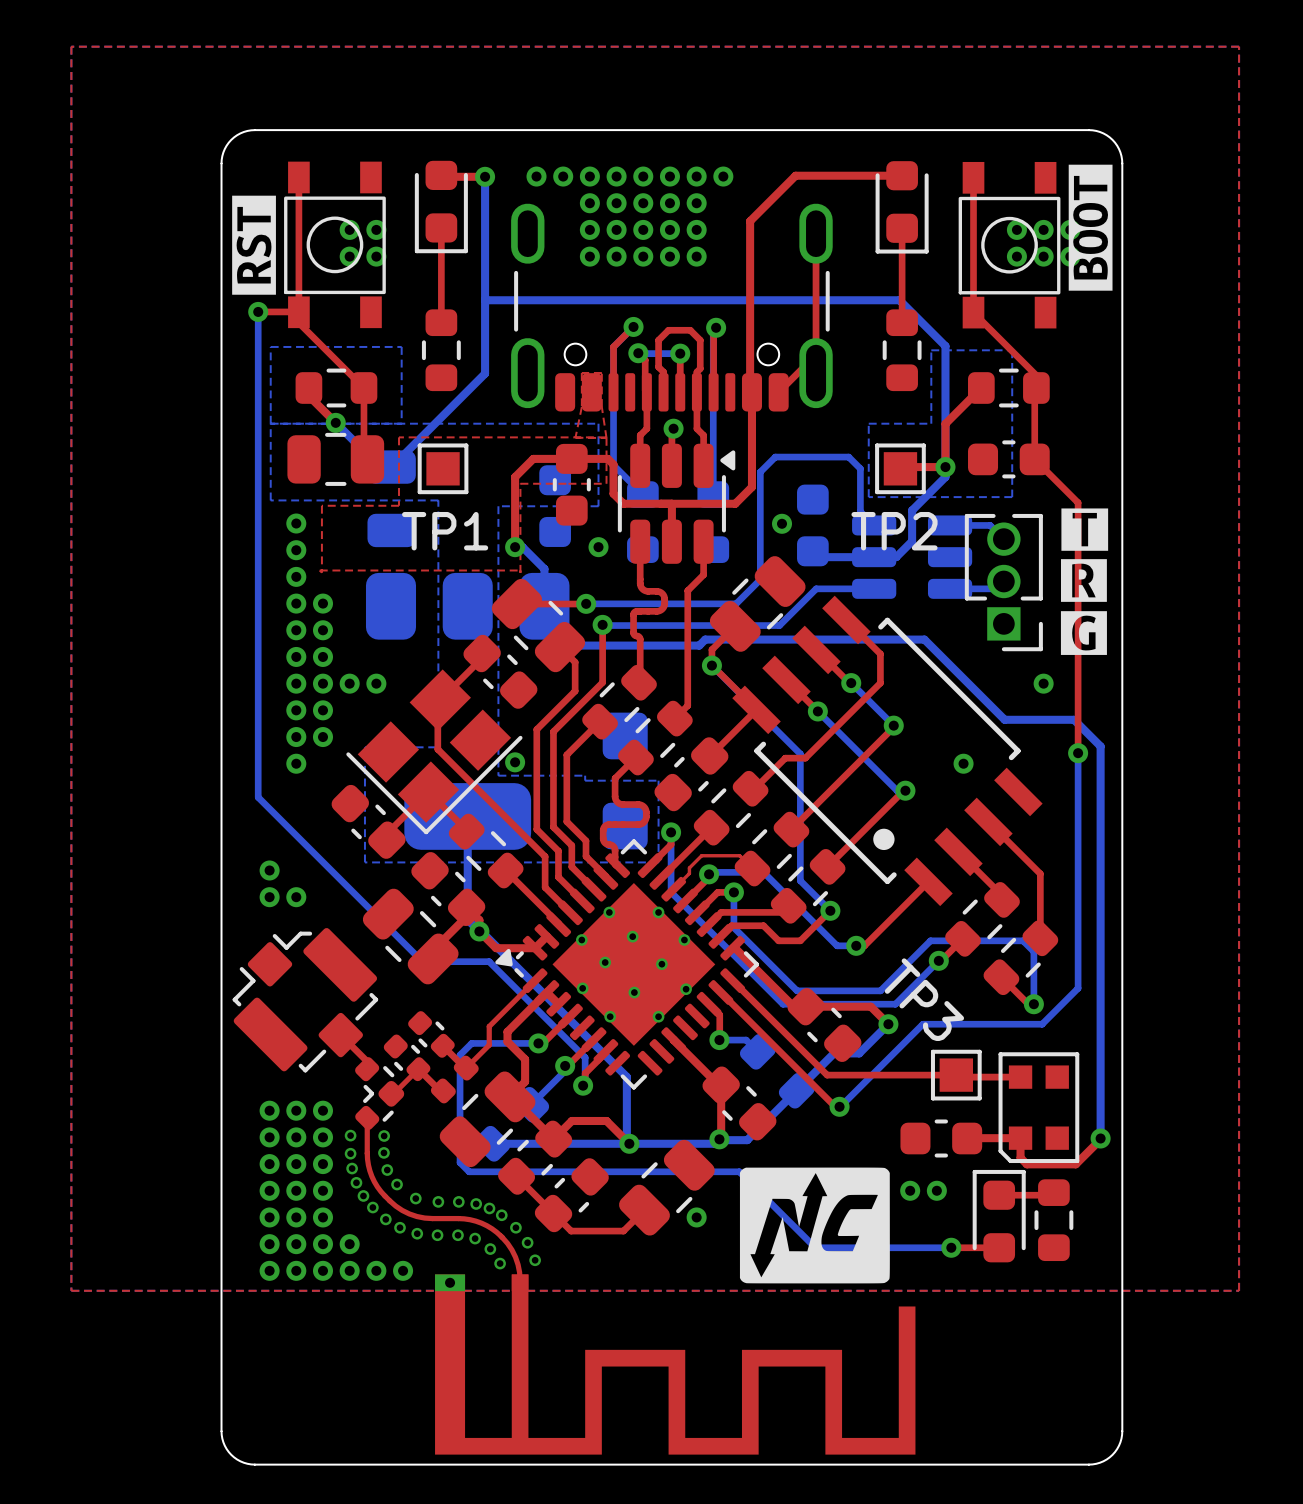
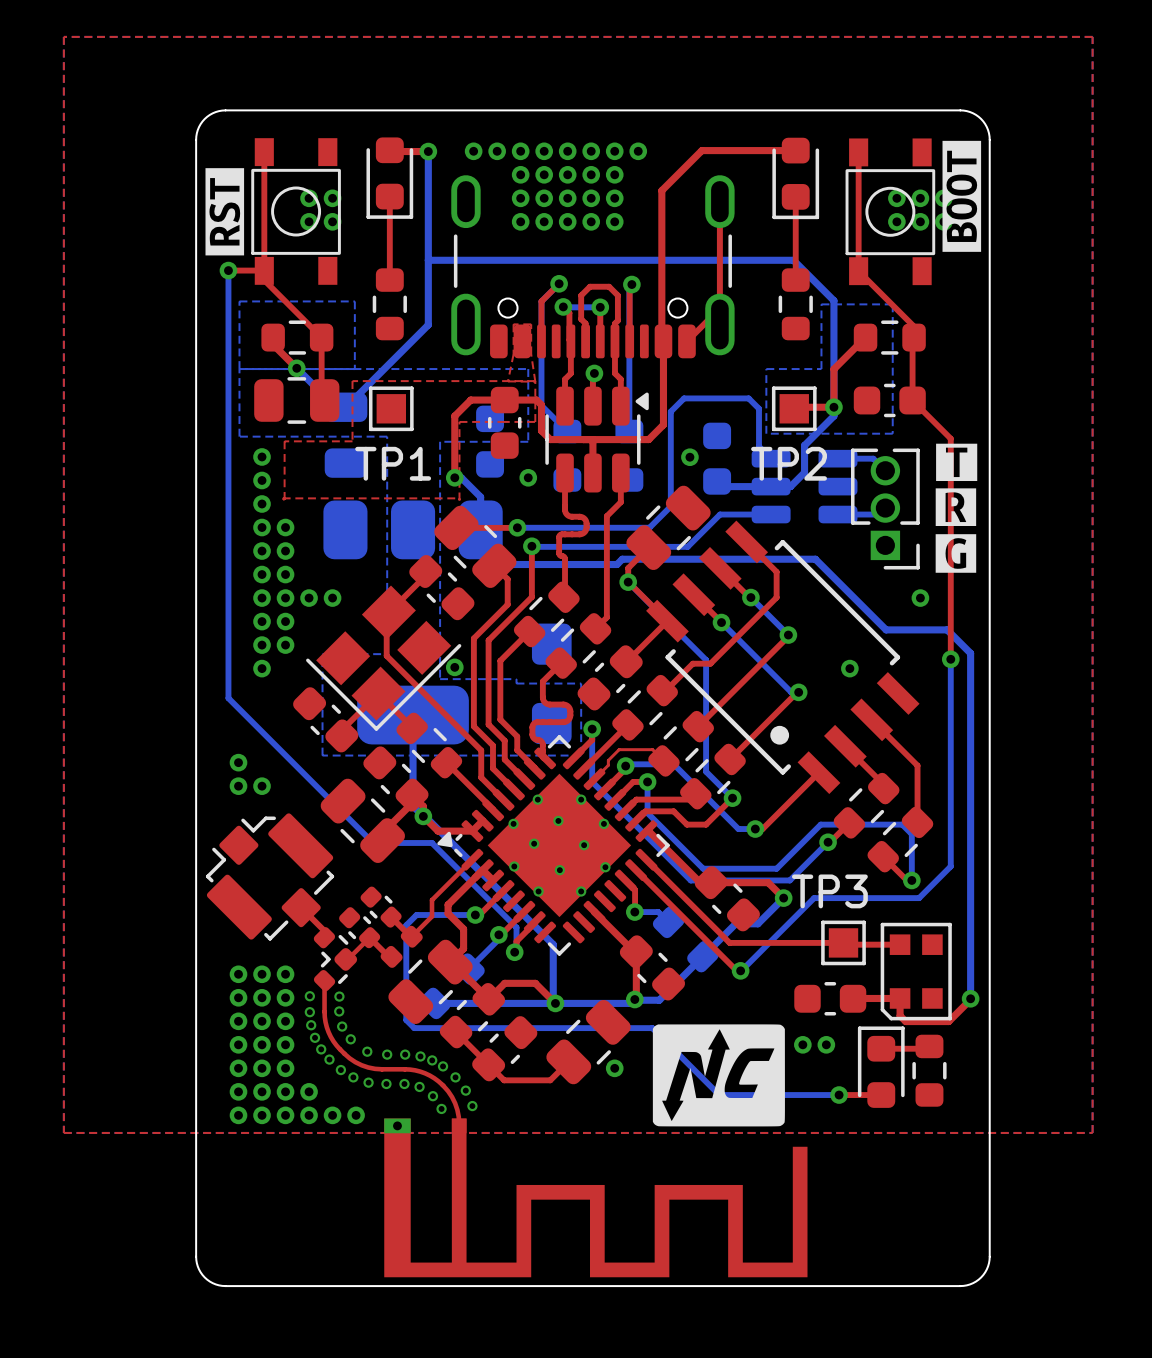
TP3 name rotation: 0° (924, 999) -> 45° counterclockwise (829, 891)

